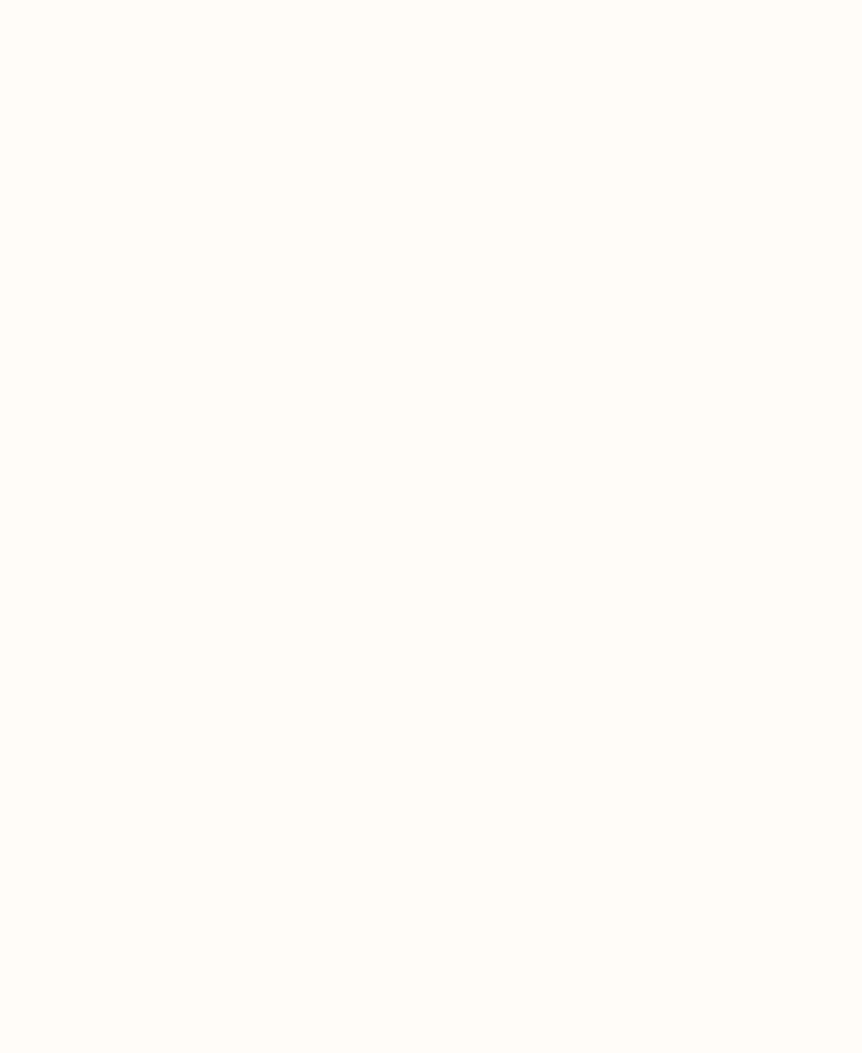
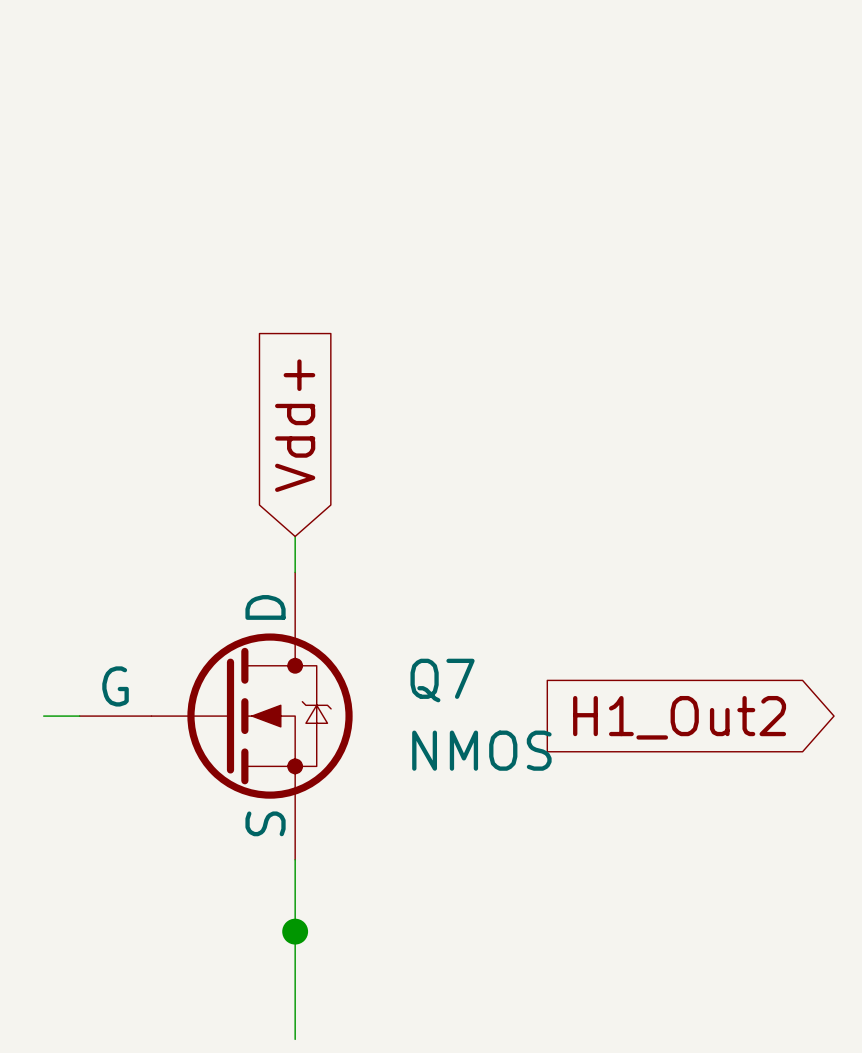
global label: none -> Vdd+ (295, 425)
wire: none -> (295, 536) (295, 572)
wire: none -> (43, 716) (79, 716)
Q7: none -> NMOS (216, 716)
global label: none -> H1_Out2 (679, 717)
wire: none -> (295, 859) (295, 1039)
junction: none -> (295, 931)

